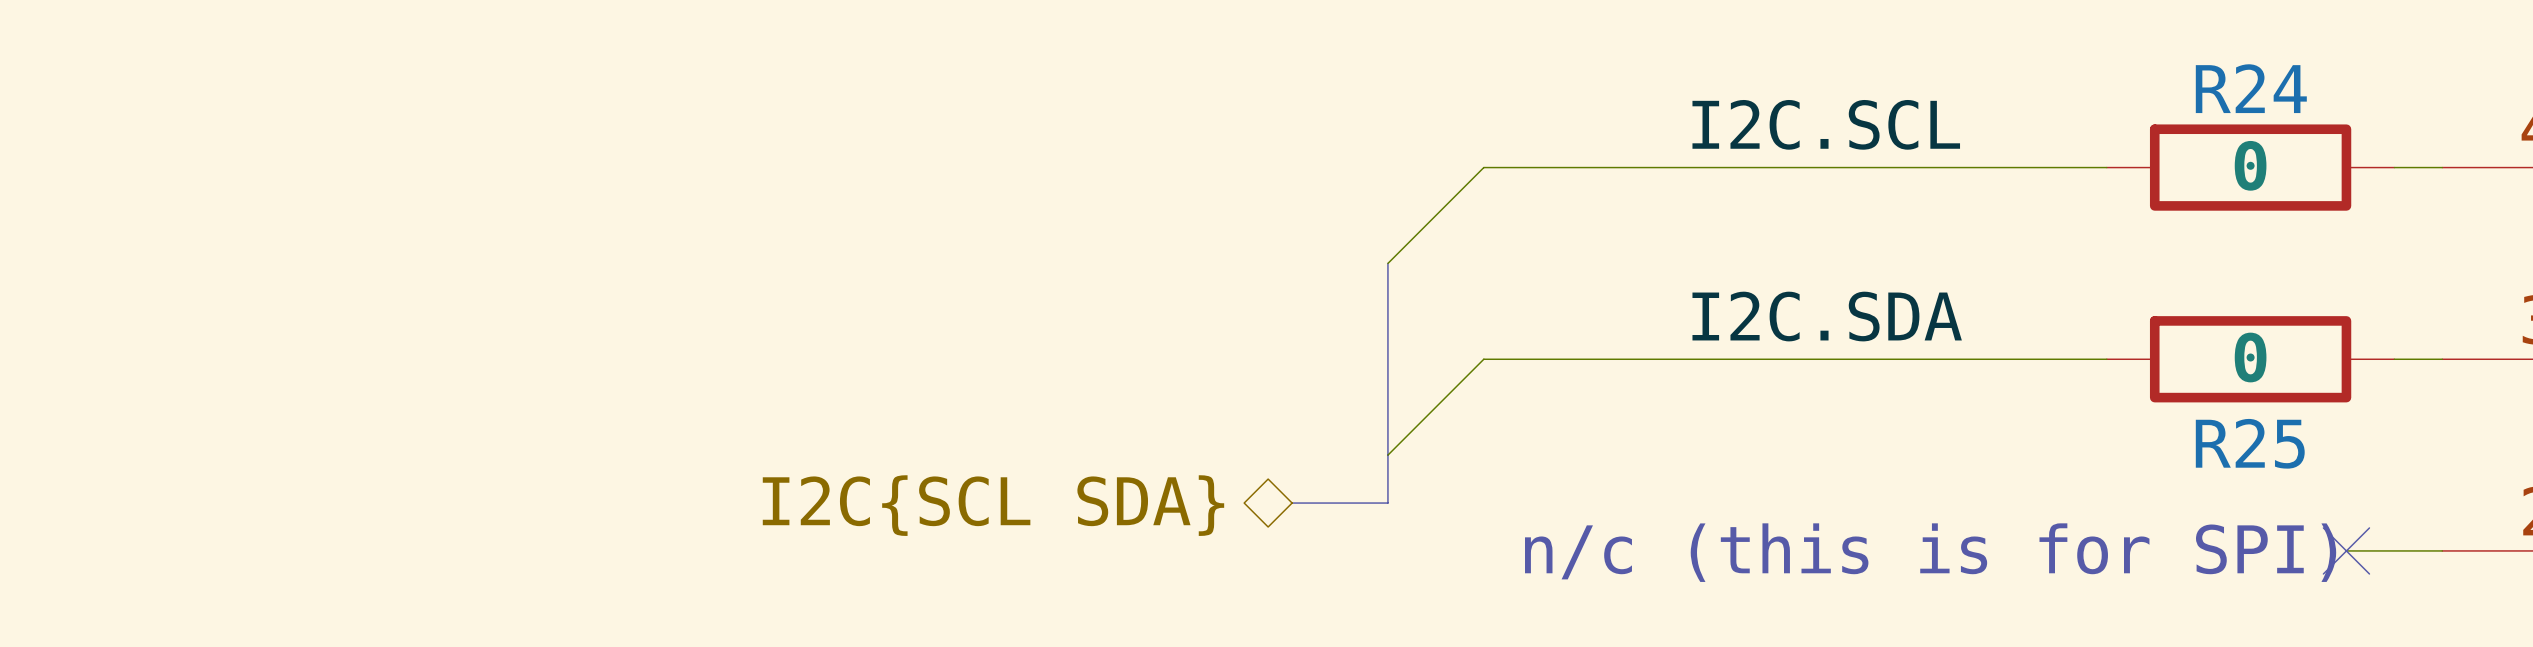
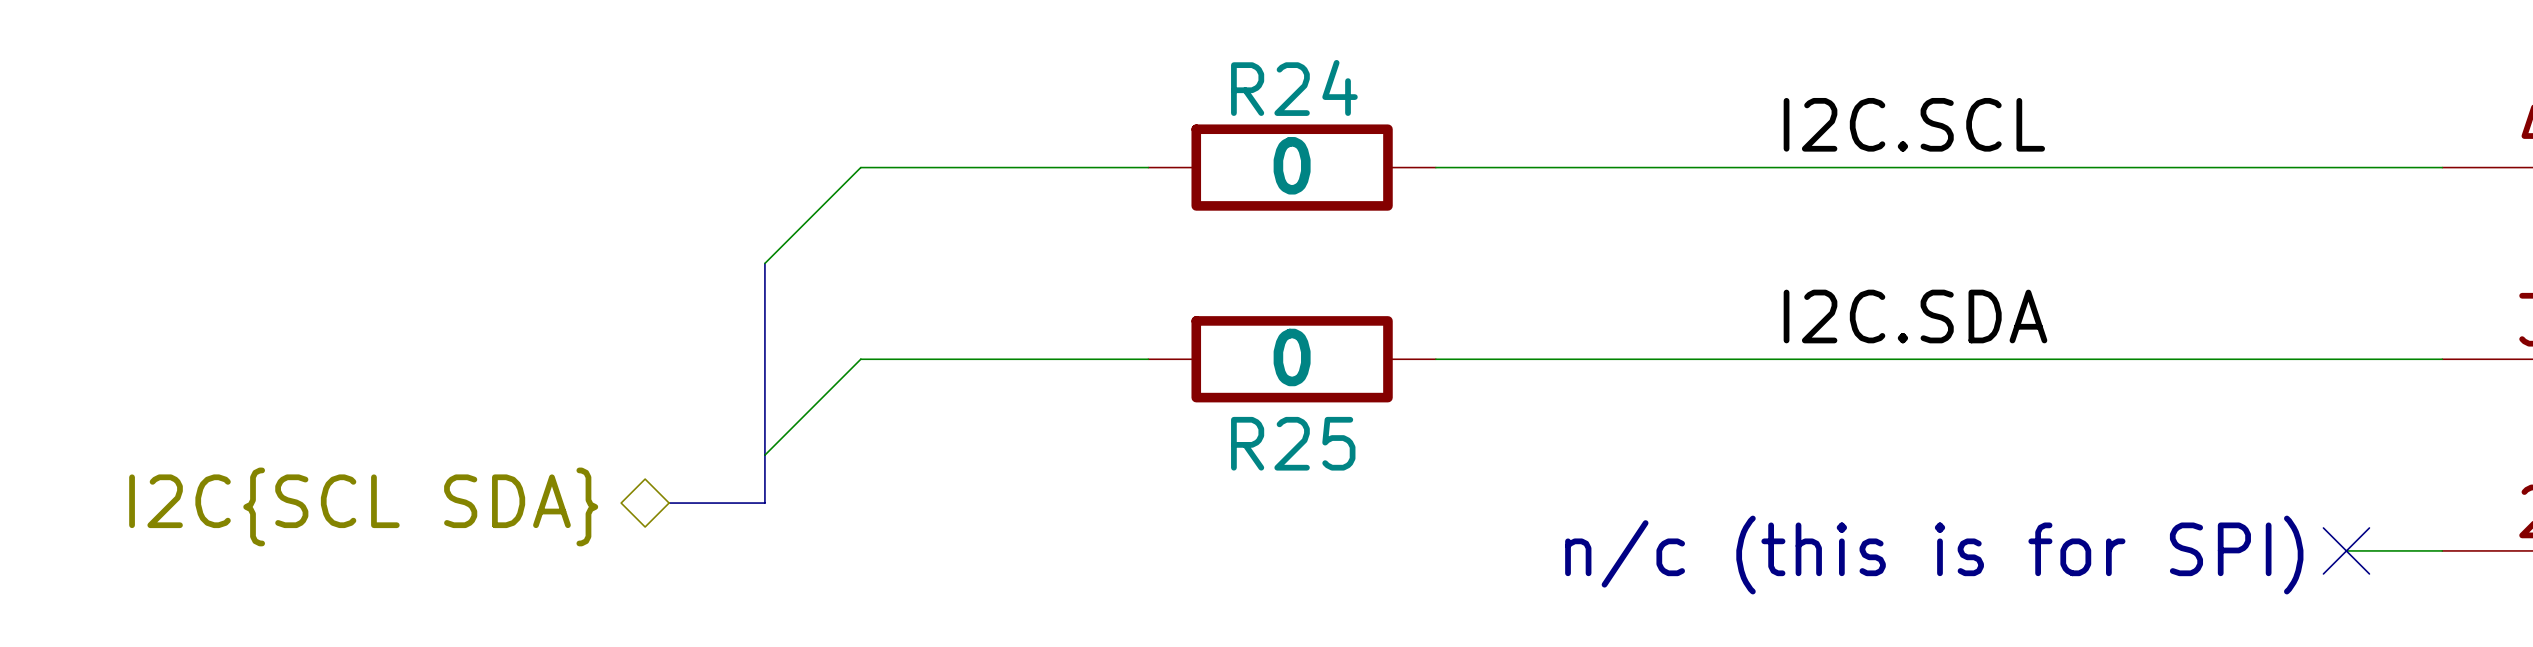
label position: I2C.SCL (1826, 124) -> I2C.SCL (1914, 124)
wire: none -> (1148, 167) (860, 167) (764, 263)
wire: (1483, 167) (1387, 263) -> (1483, 167) (1435, 167)
wire: none -> (2106, 167) (2394, 167)
R24 position: (2250, 167) -> (1292, 167)
bus: (1387, 263) (1387, 503) (1292, 503) -> (764, 263) (764, 503) (669, 503)
label position: I2C.SDA (1827, 316) -> I2C.SDA (1915, 316)
wire: none -> (1148, 359) (860, 359) (764, 455)
wire: (1483, 359) (1387, 455) -> (1483, 359) (1435, 359)
wire: none -> (2106, 359) (2394, 359)
R25 position: (2250, 359) -> (1292, 359)
hierarchical label position: I2C{SCL SDA} (993, 505) -> I2C{SCL SDA} (363, 506)

